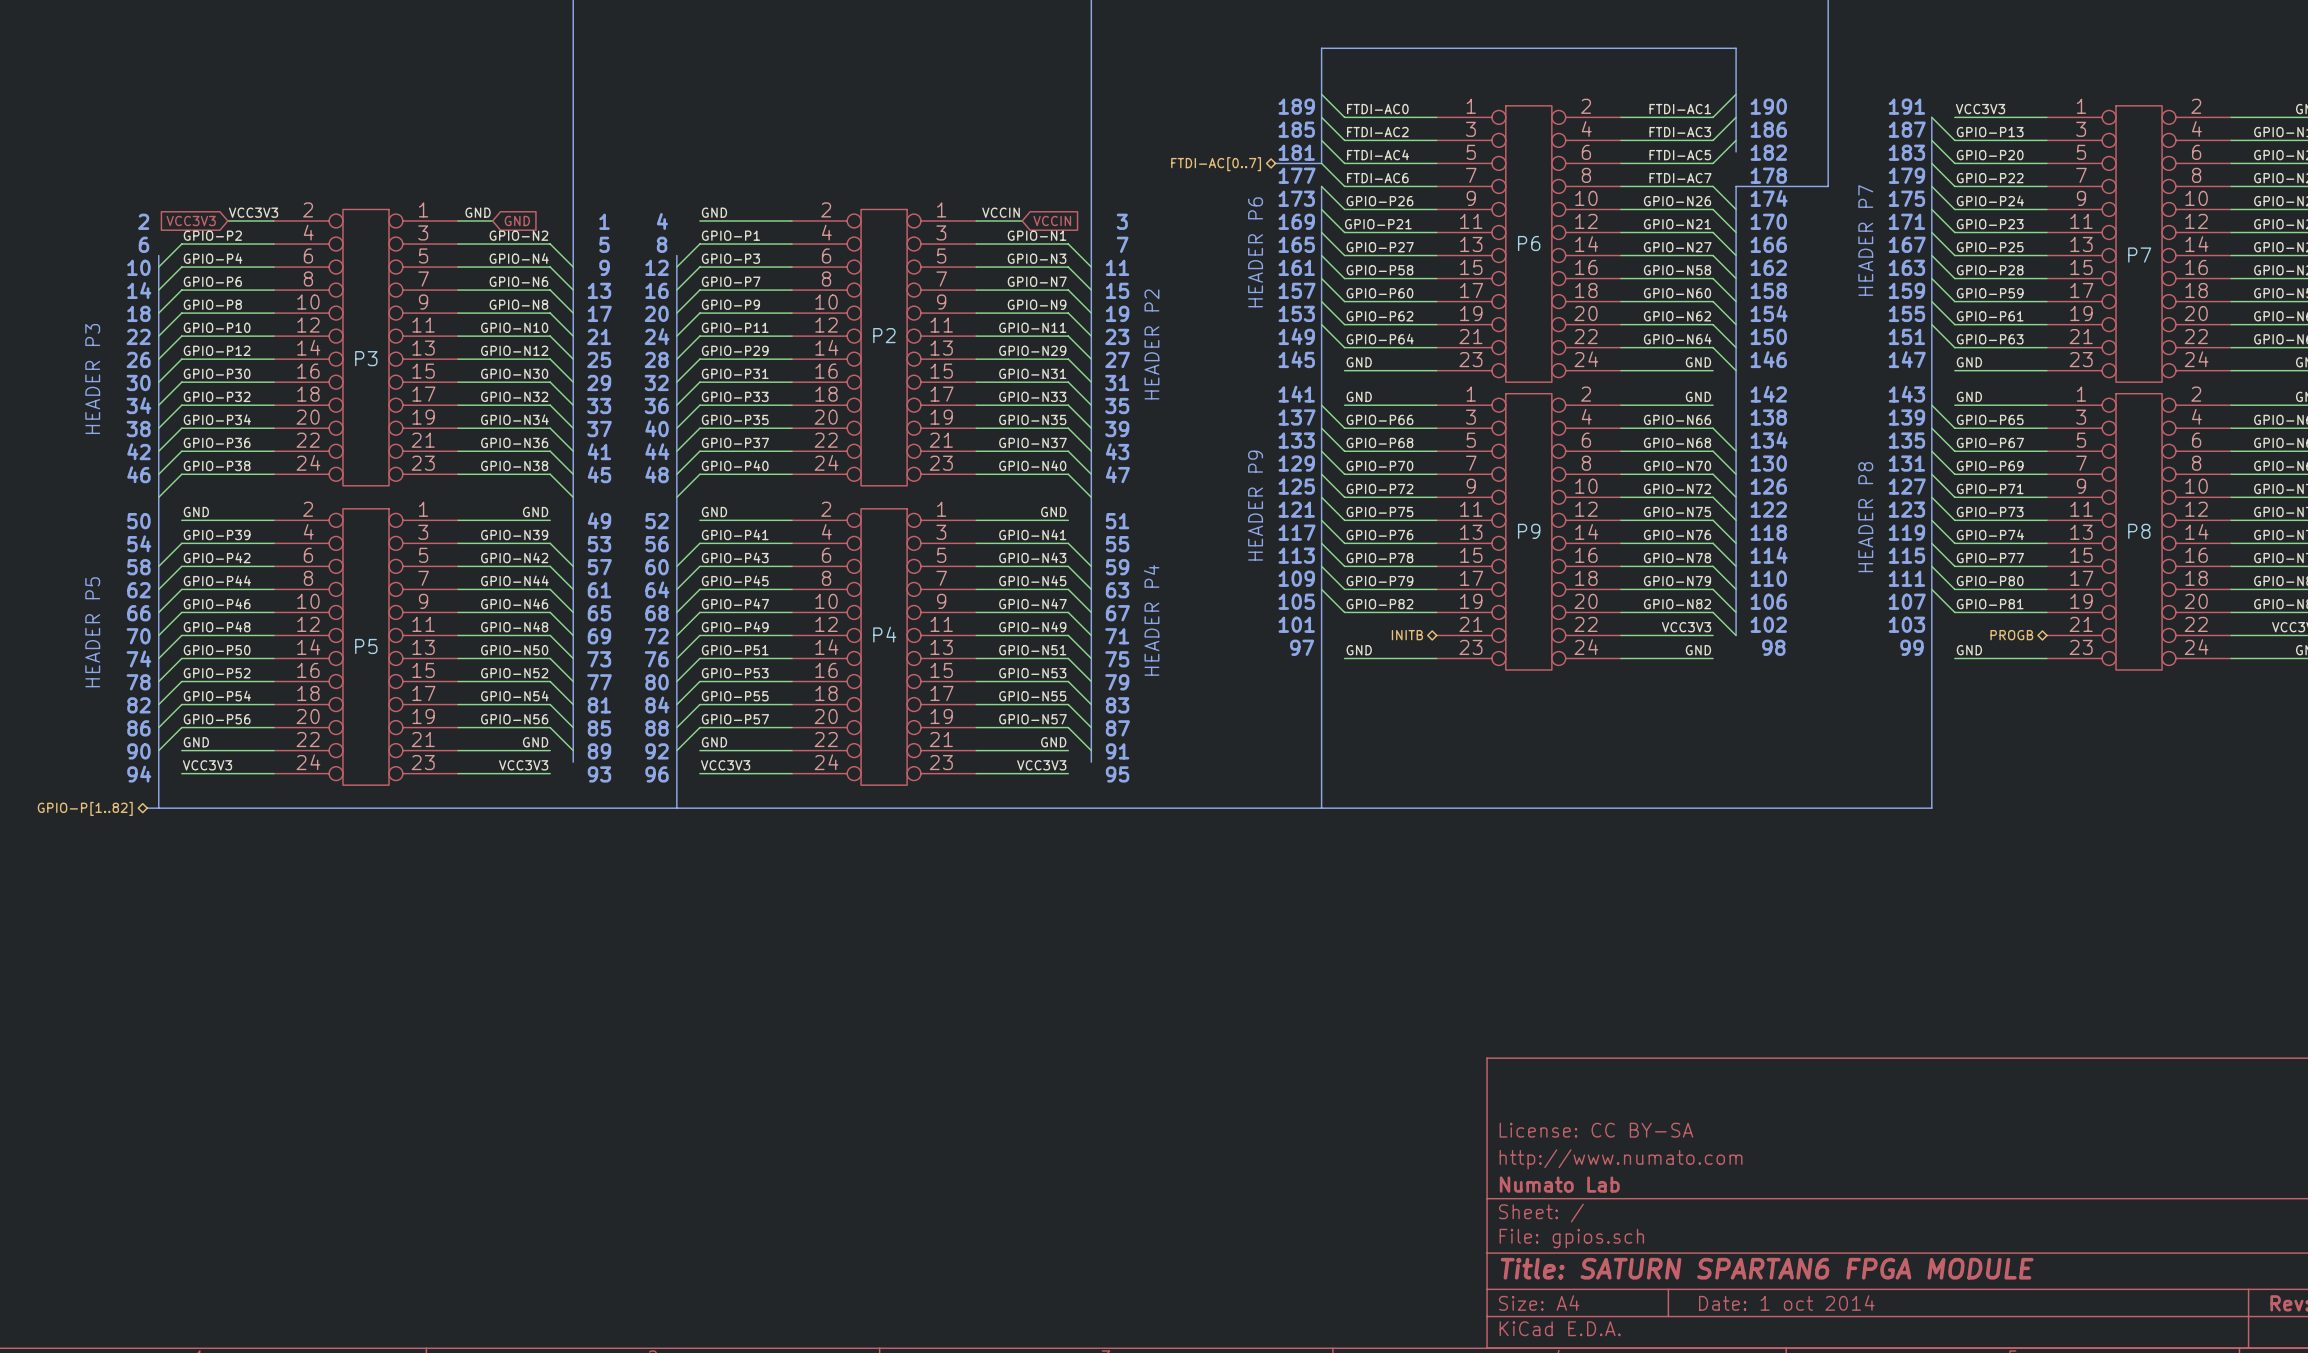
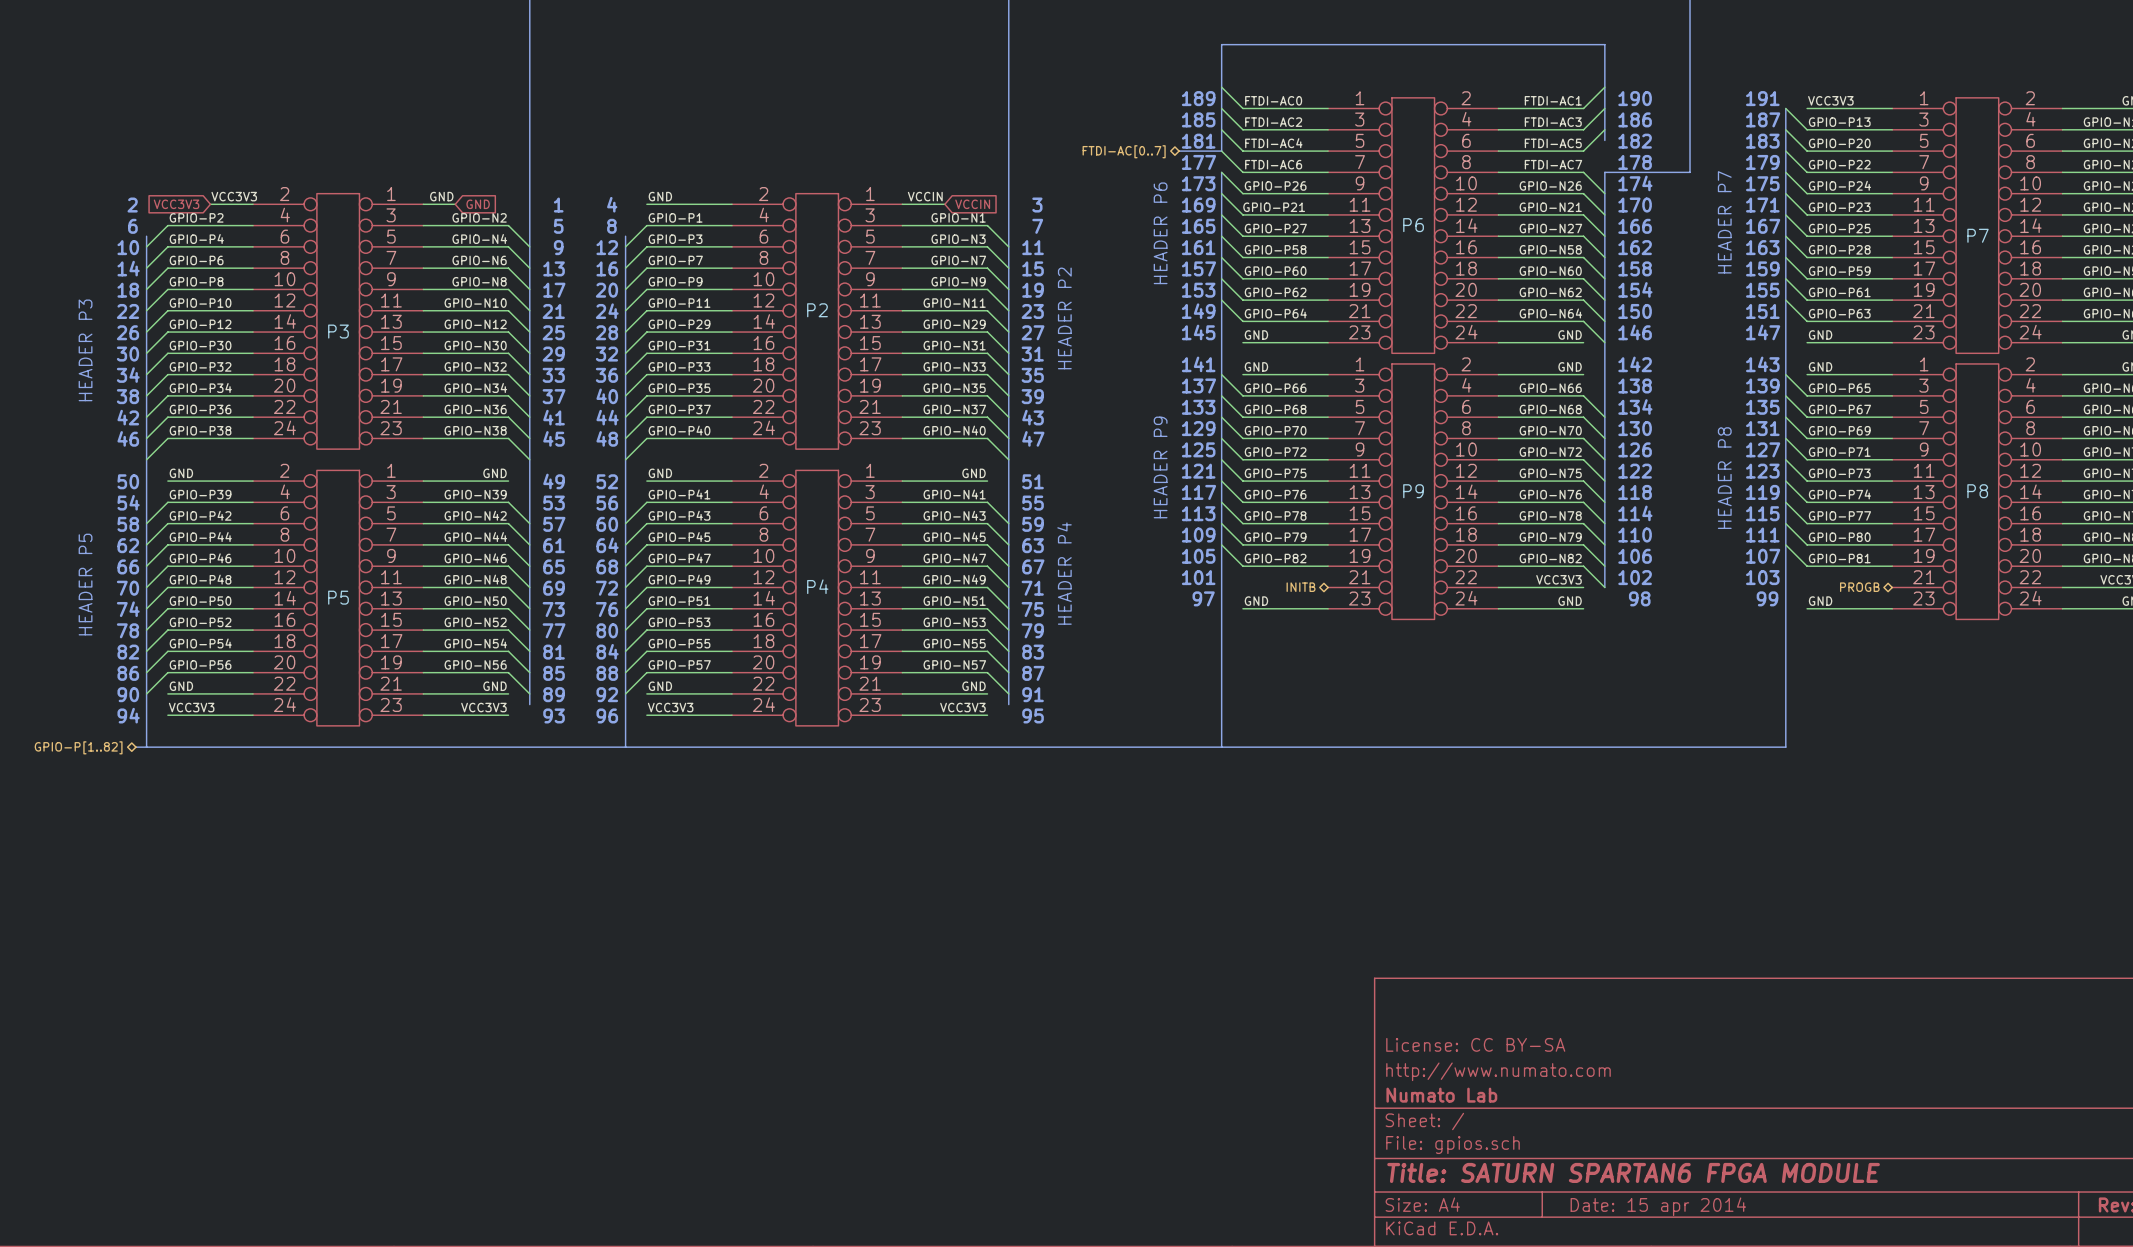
title block: Date: 1 oct 2014 (1786, 1303) -> Date: 15 apr 2014 (1658, 1206)

